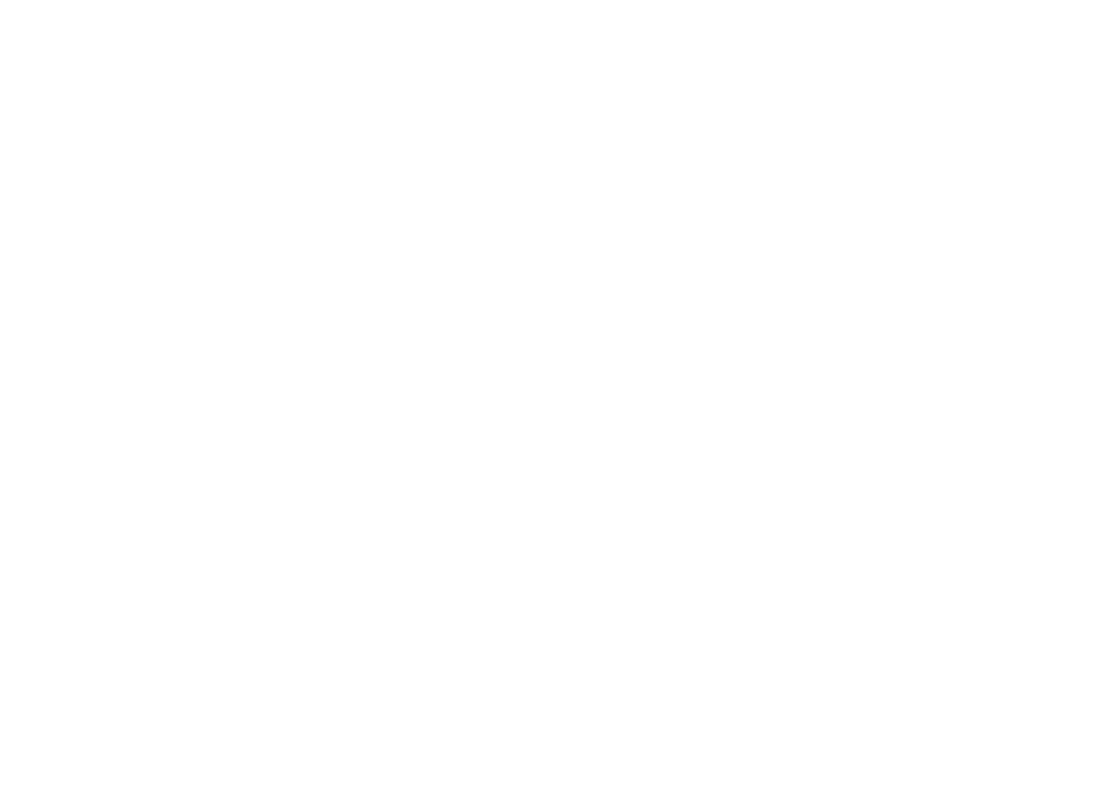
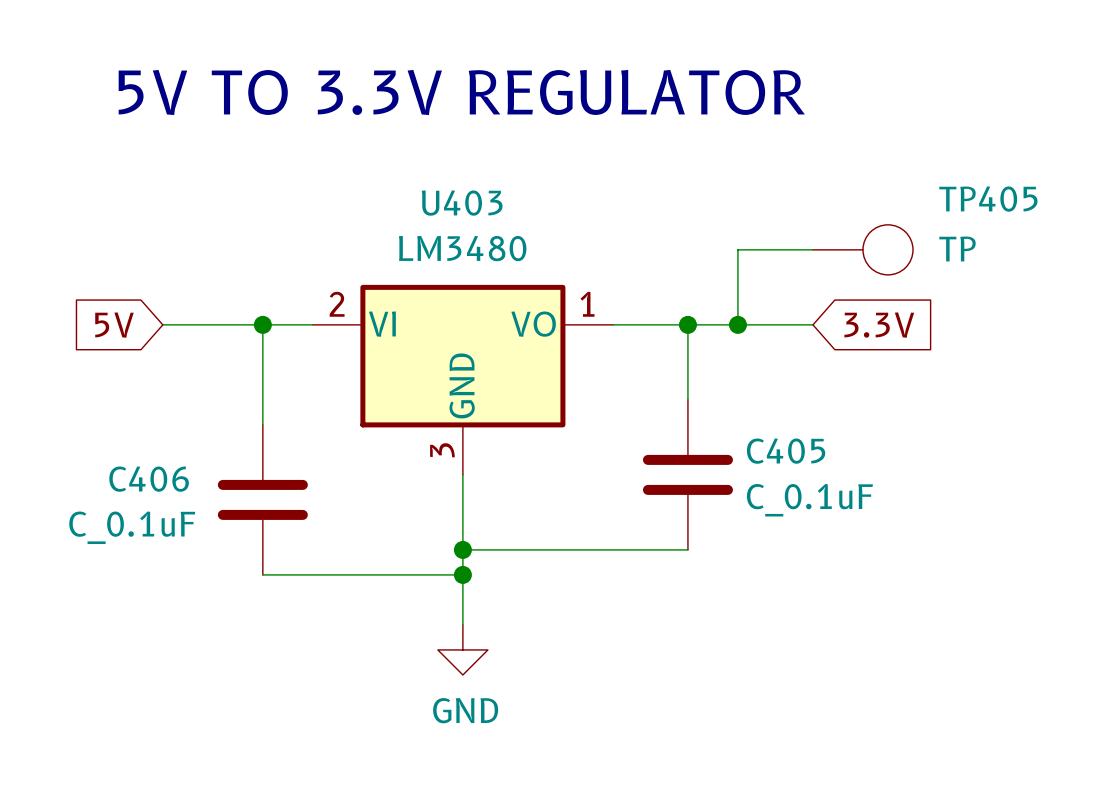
text: none -> 5V TO 3.3V REGULATOR (461, 92)
wire: none -> (812, 249) (737, 249) (737, 324)
TP405: none -> TP (862, 249)
global label: none -> 5V (114, 325)
wire: none -> (162, 324) (312, 324)
wire: none -> (262, 324) (262, 424)
junction: none -> (262, 324)
wire: none -> (612, 324) (812, 324)
wire: none -> (687, 324) (687, 399)
junction: none -> (687, 324)
junction: none -> (737, 324)
global label: none -> 3.3V (879, 325)
U403: none -> LM3480 (462, 379)
wire: none -> (462, 474) (462, 624)
C405: none -> C_0.1uF (687, 474)
C406: none -> C_0.1uF (262, 499)
wire: none -> (462, 549) (687, 549)
junction: none -> (462, 549)
wire: none -> (262, 574) (462, 574)
junction: none -> (462, 574)
power symbol: none -> GND (462, 649)

